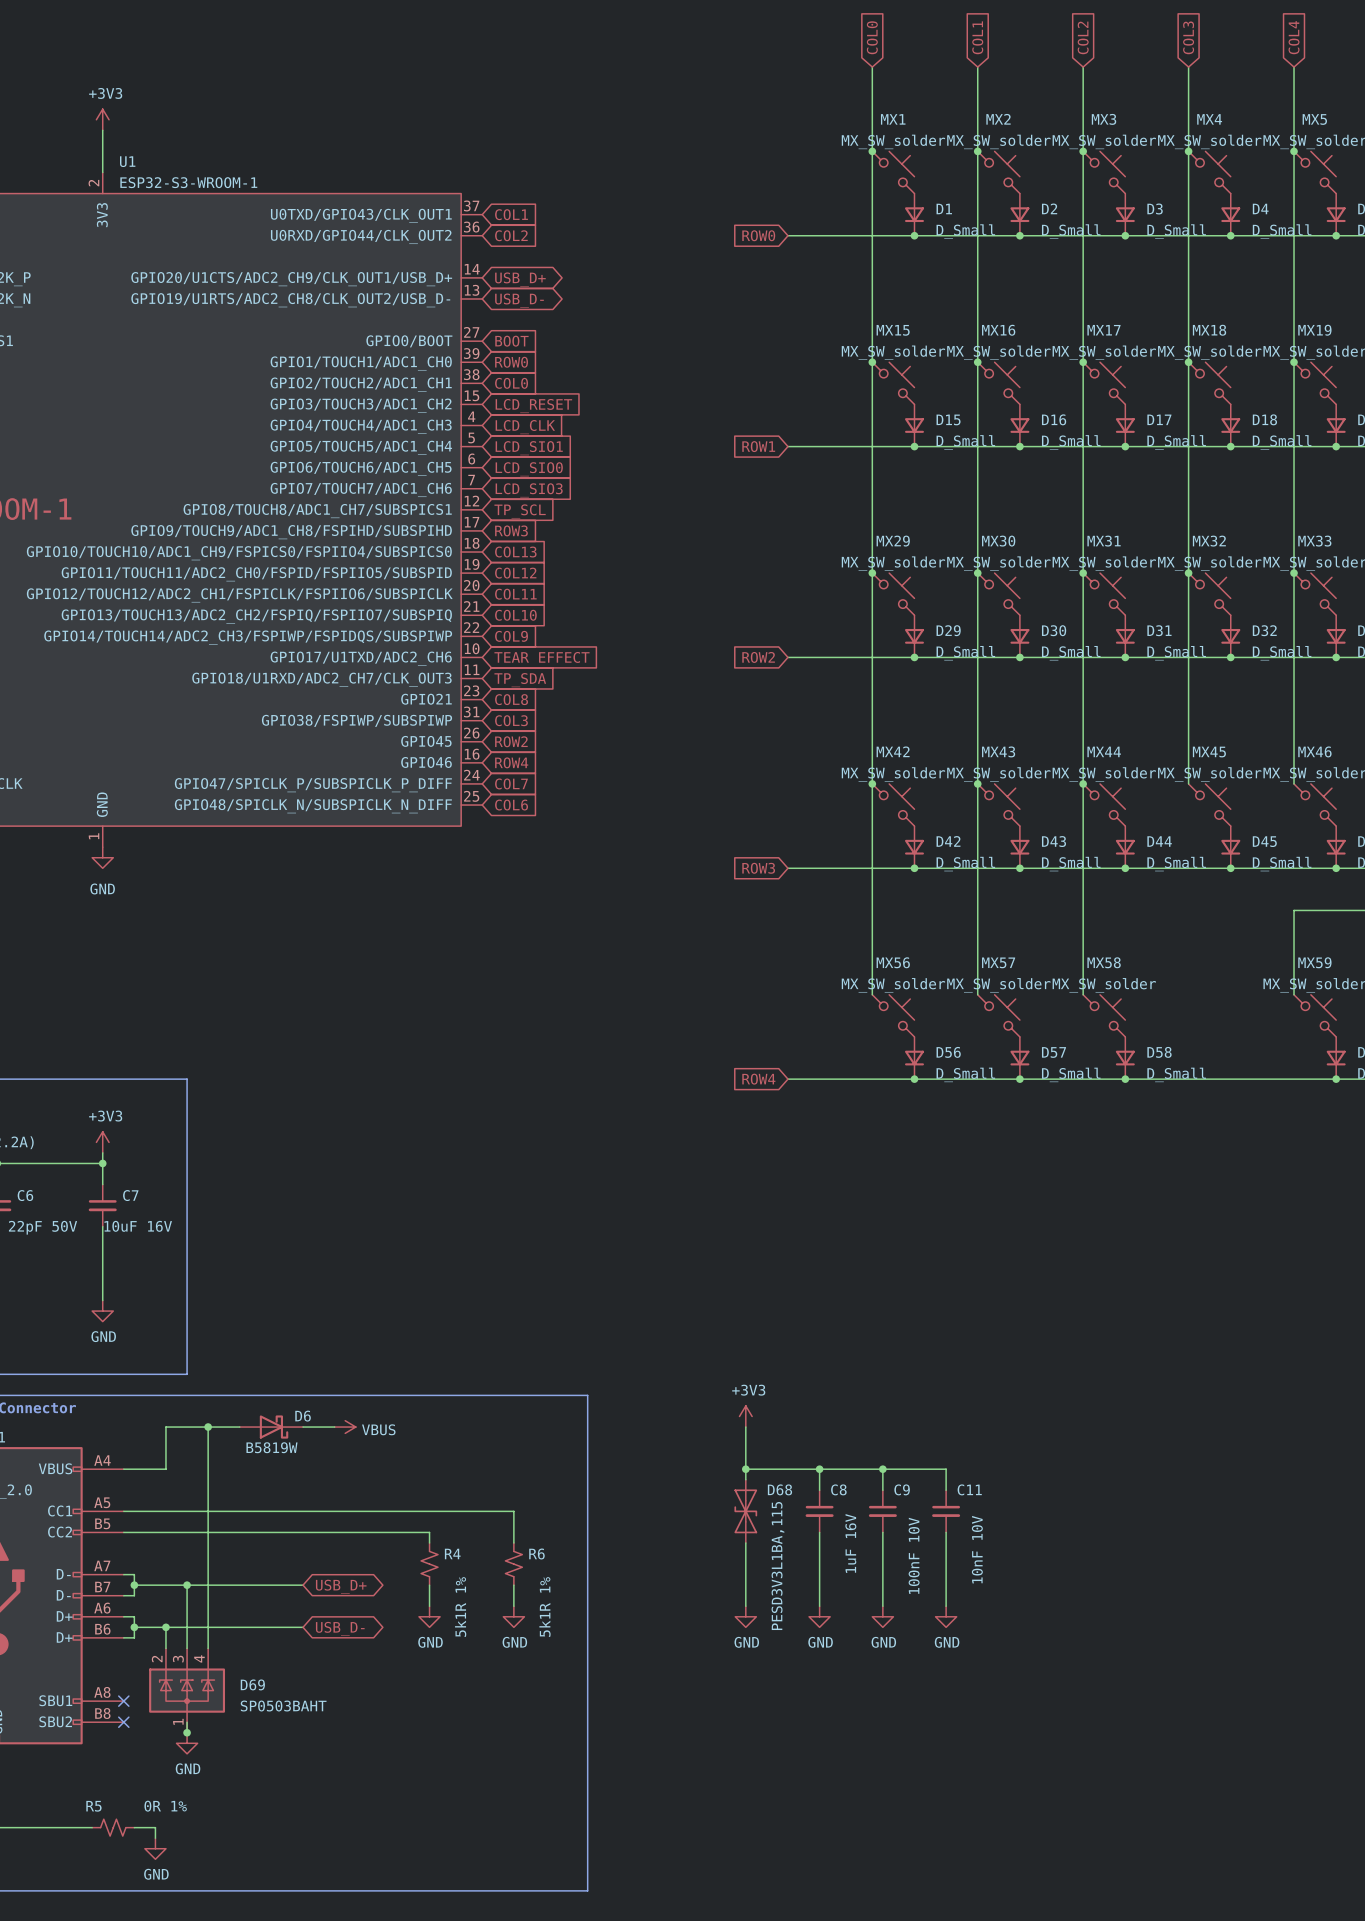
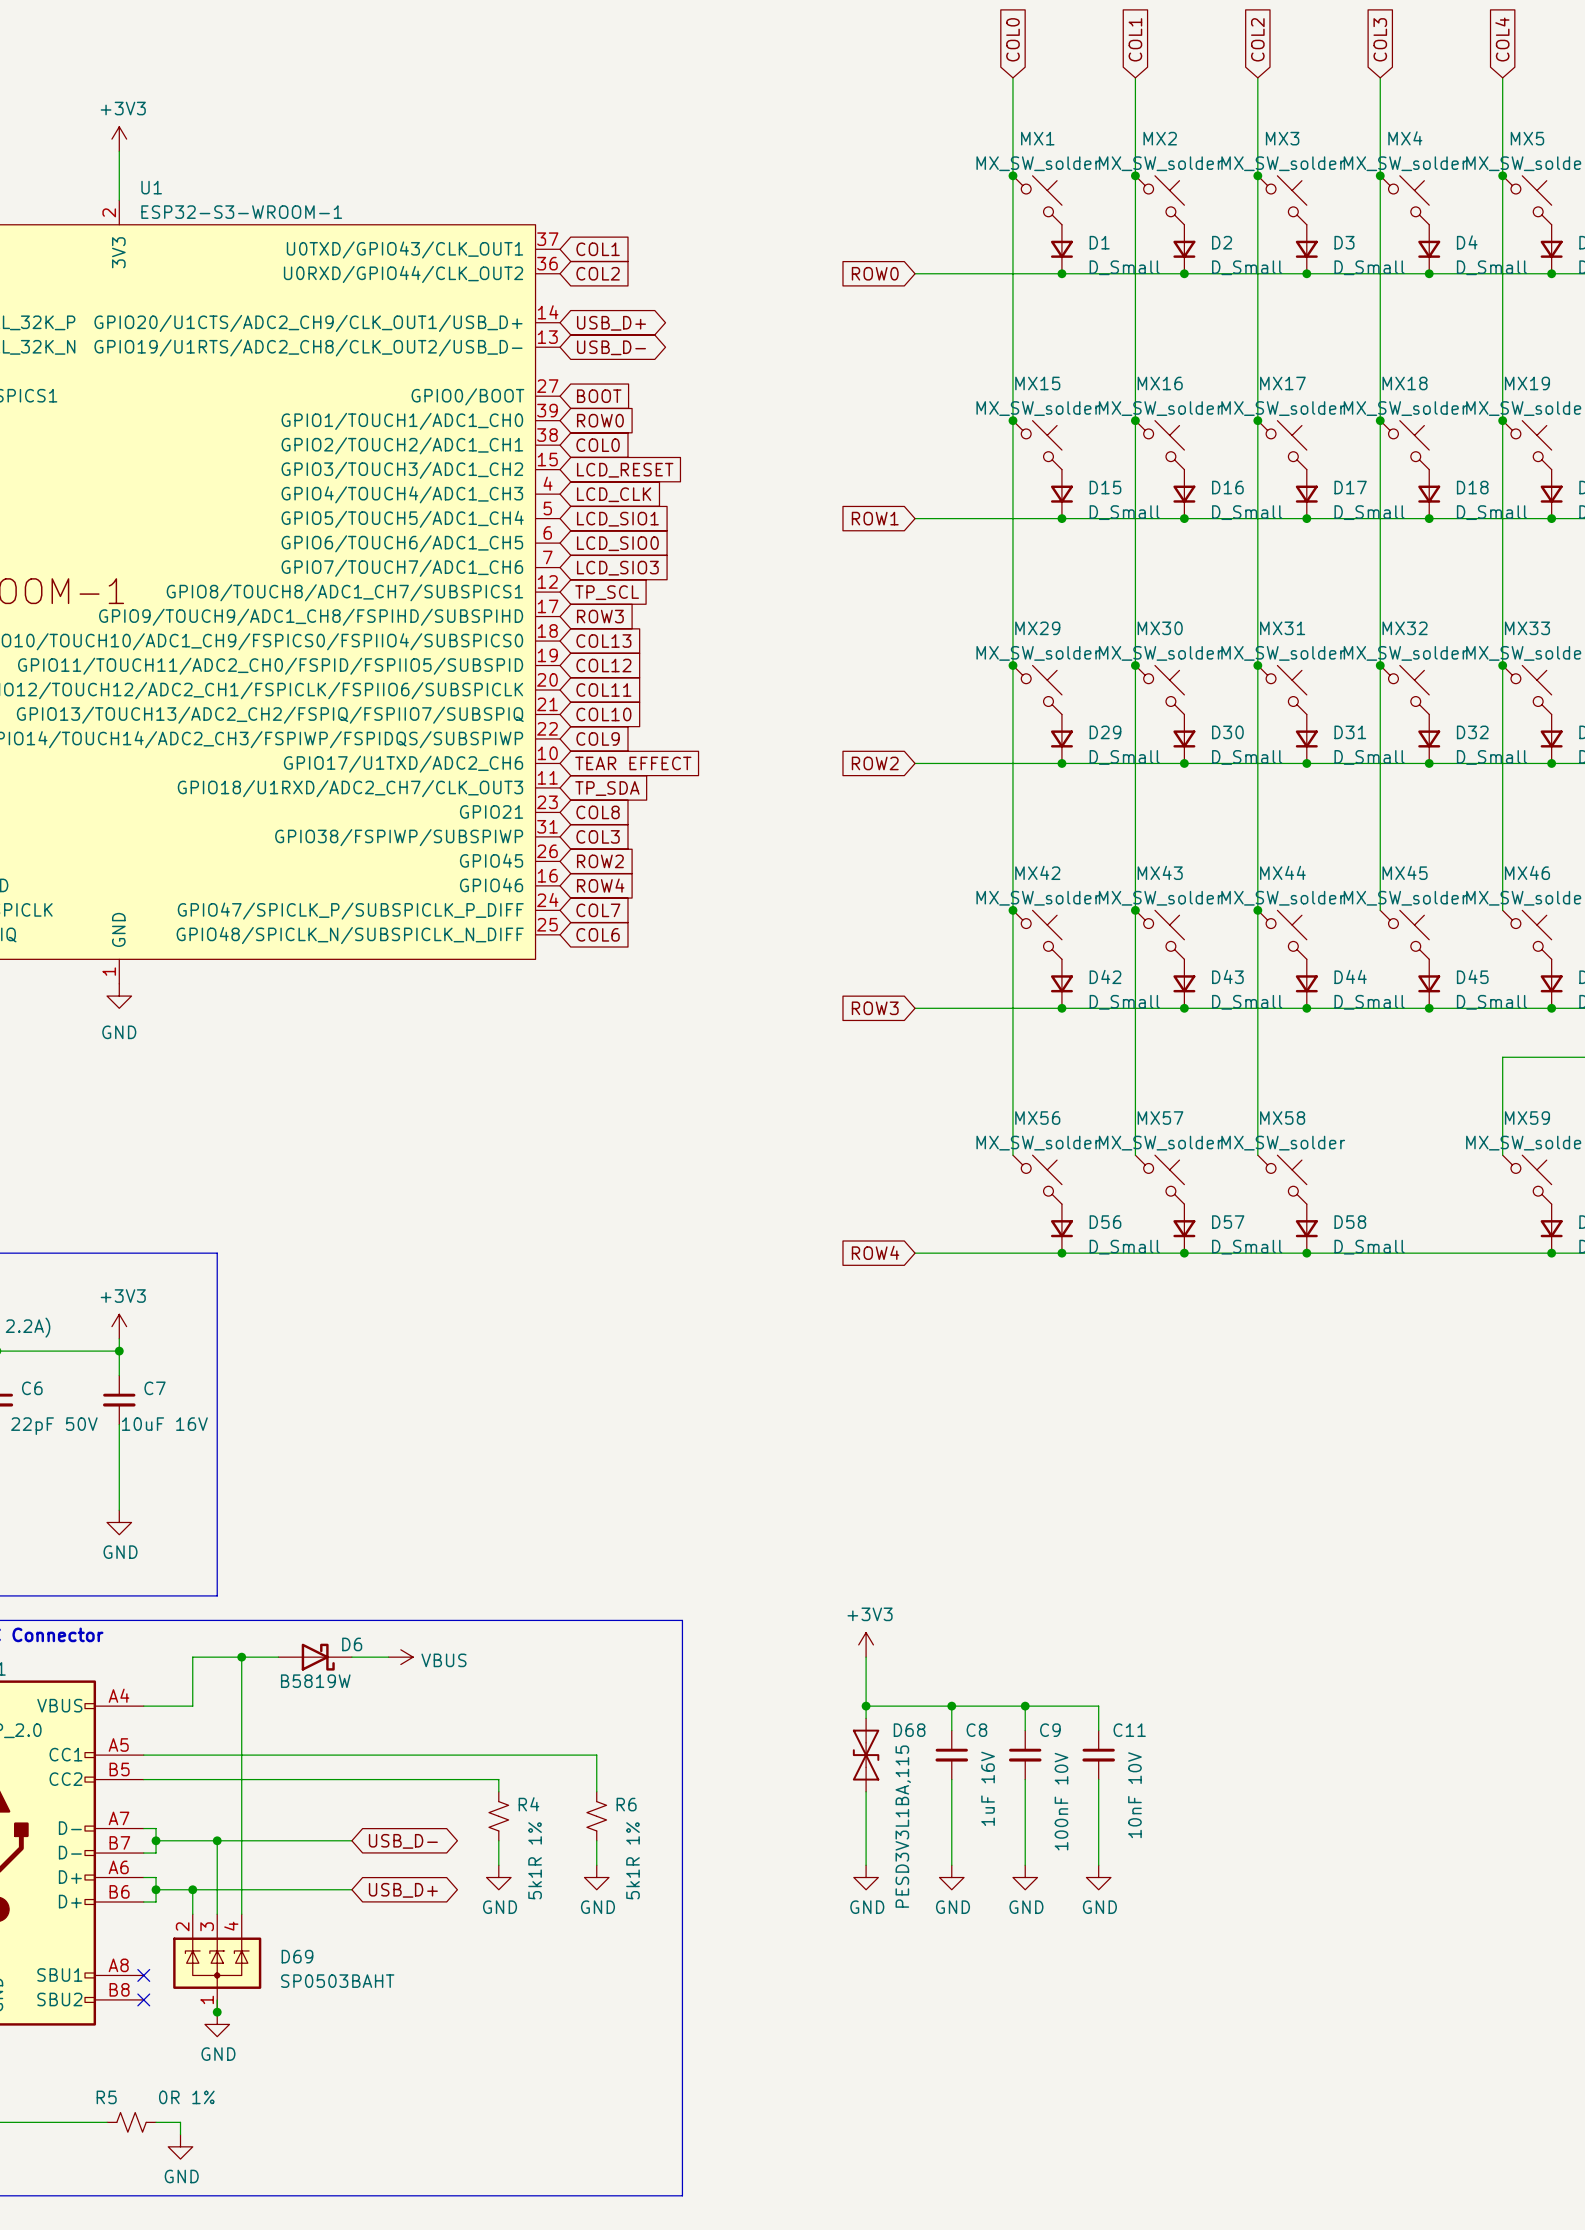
global label: USB_D+ (341, 1586) -> USB_D- (403, 1841)
global label: USB_D- (340, 1628) -> USB_D+ (403, 1890)

